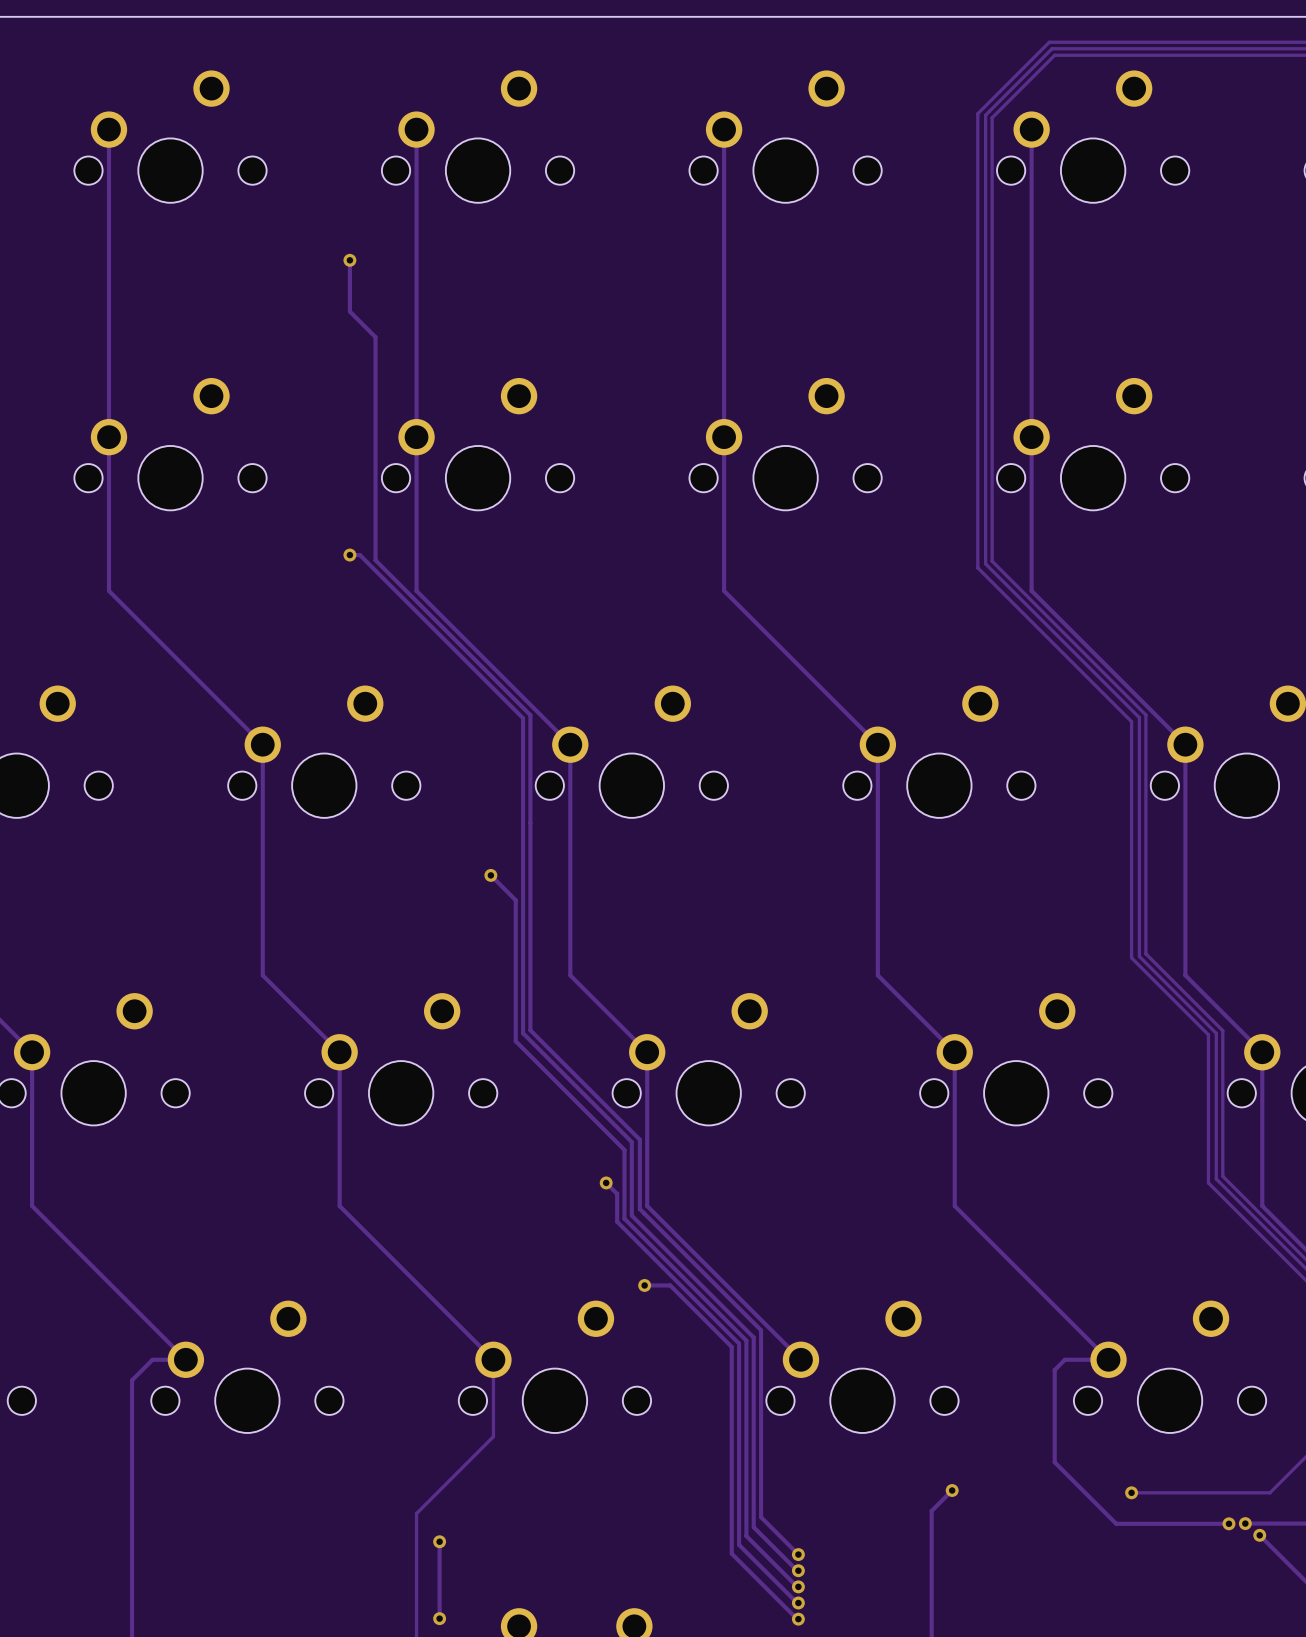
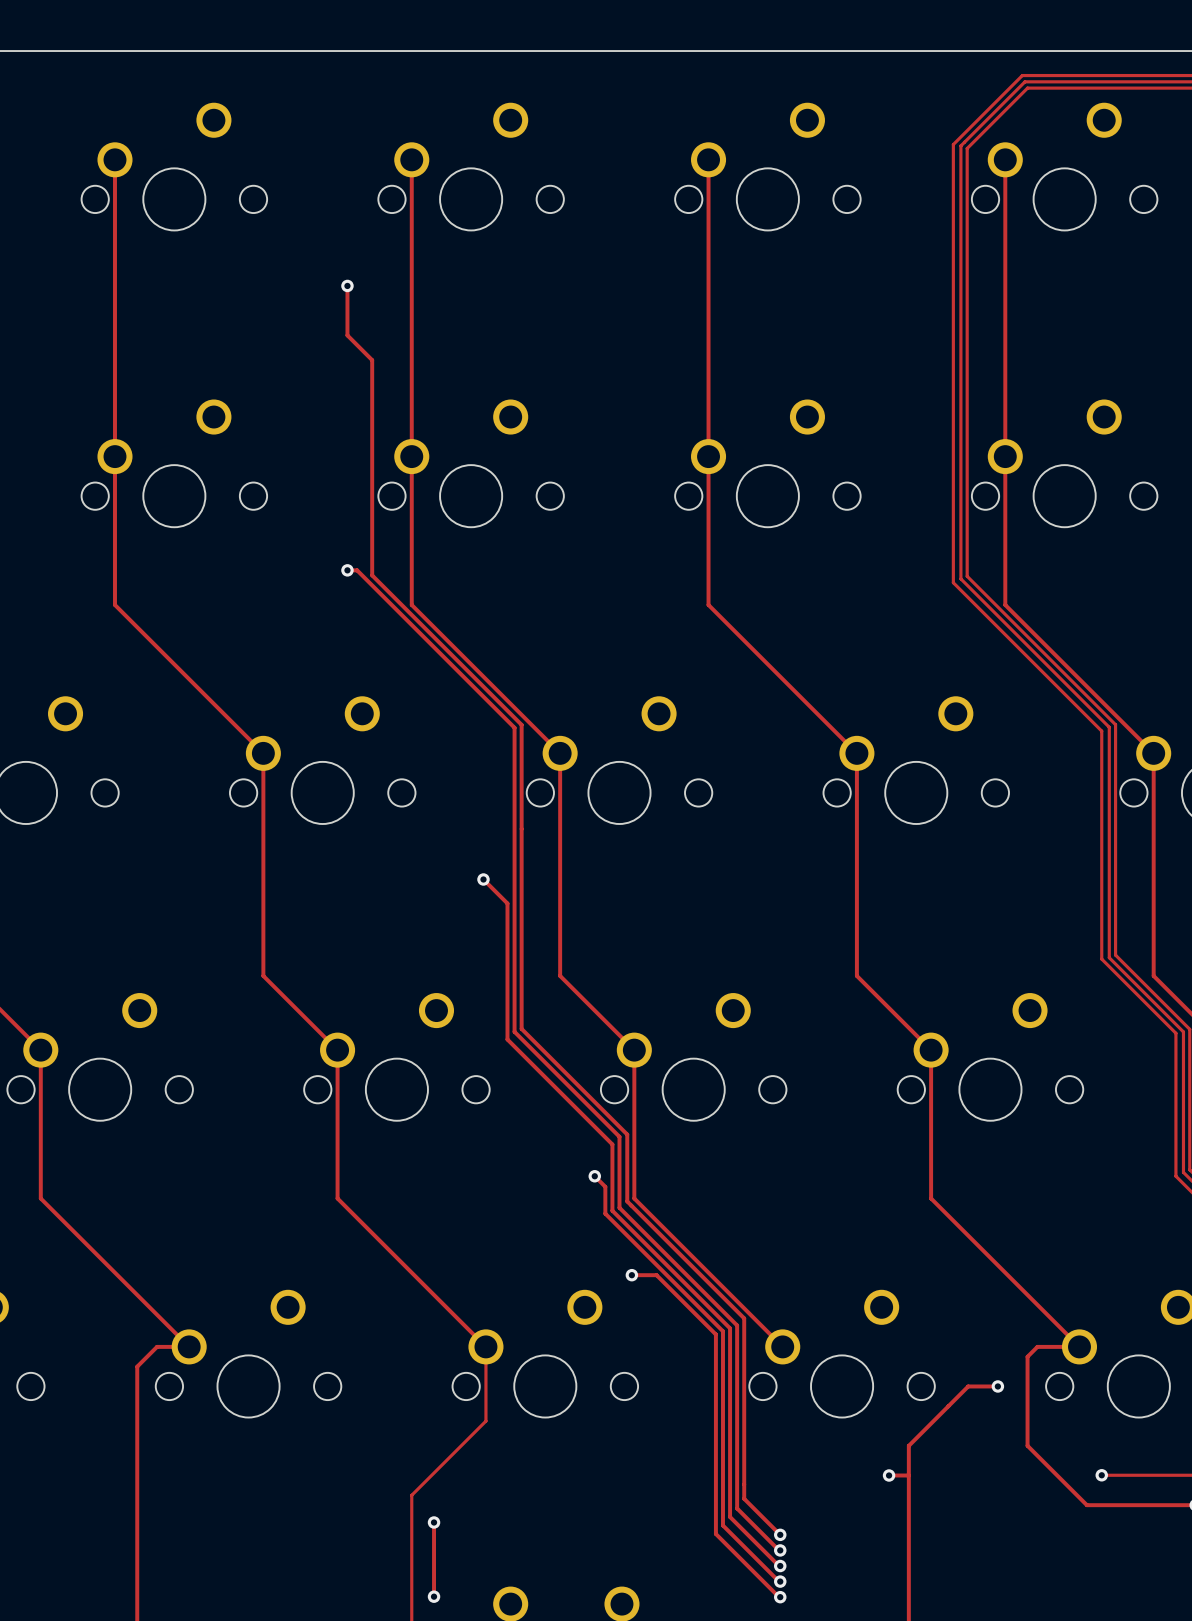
via: none -> (997, 1386)
track: (952, 1490) (931, 1511) -> (997, 1386) (968, 1386) (908, 1445) (908, 1492)
via position: (952, 1490) -> (889, 1475)
track: none -> (889, 1475) (908, 1475)

